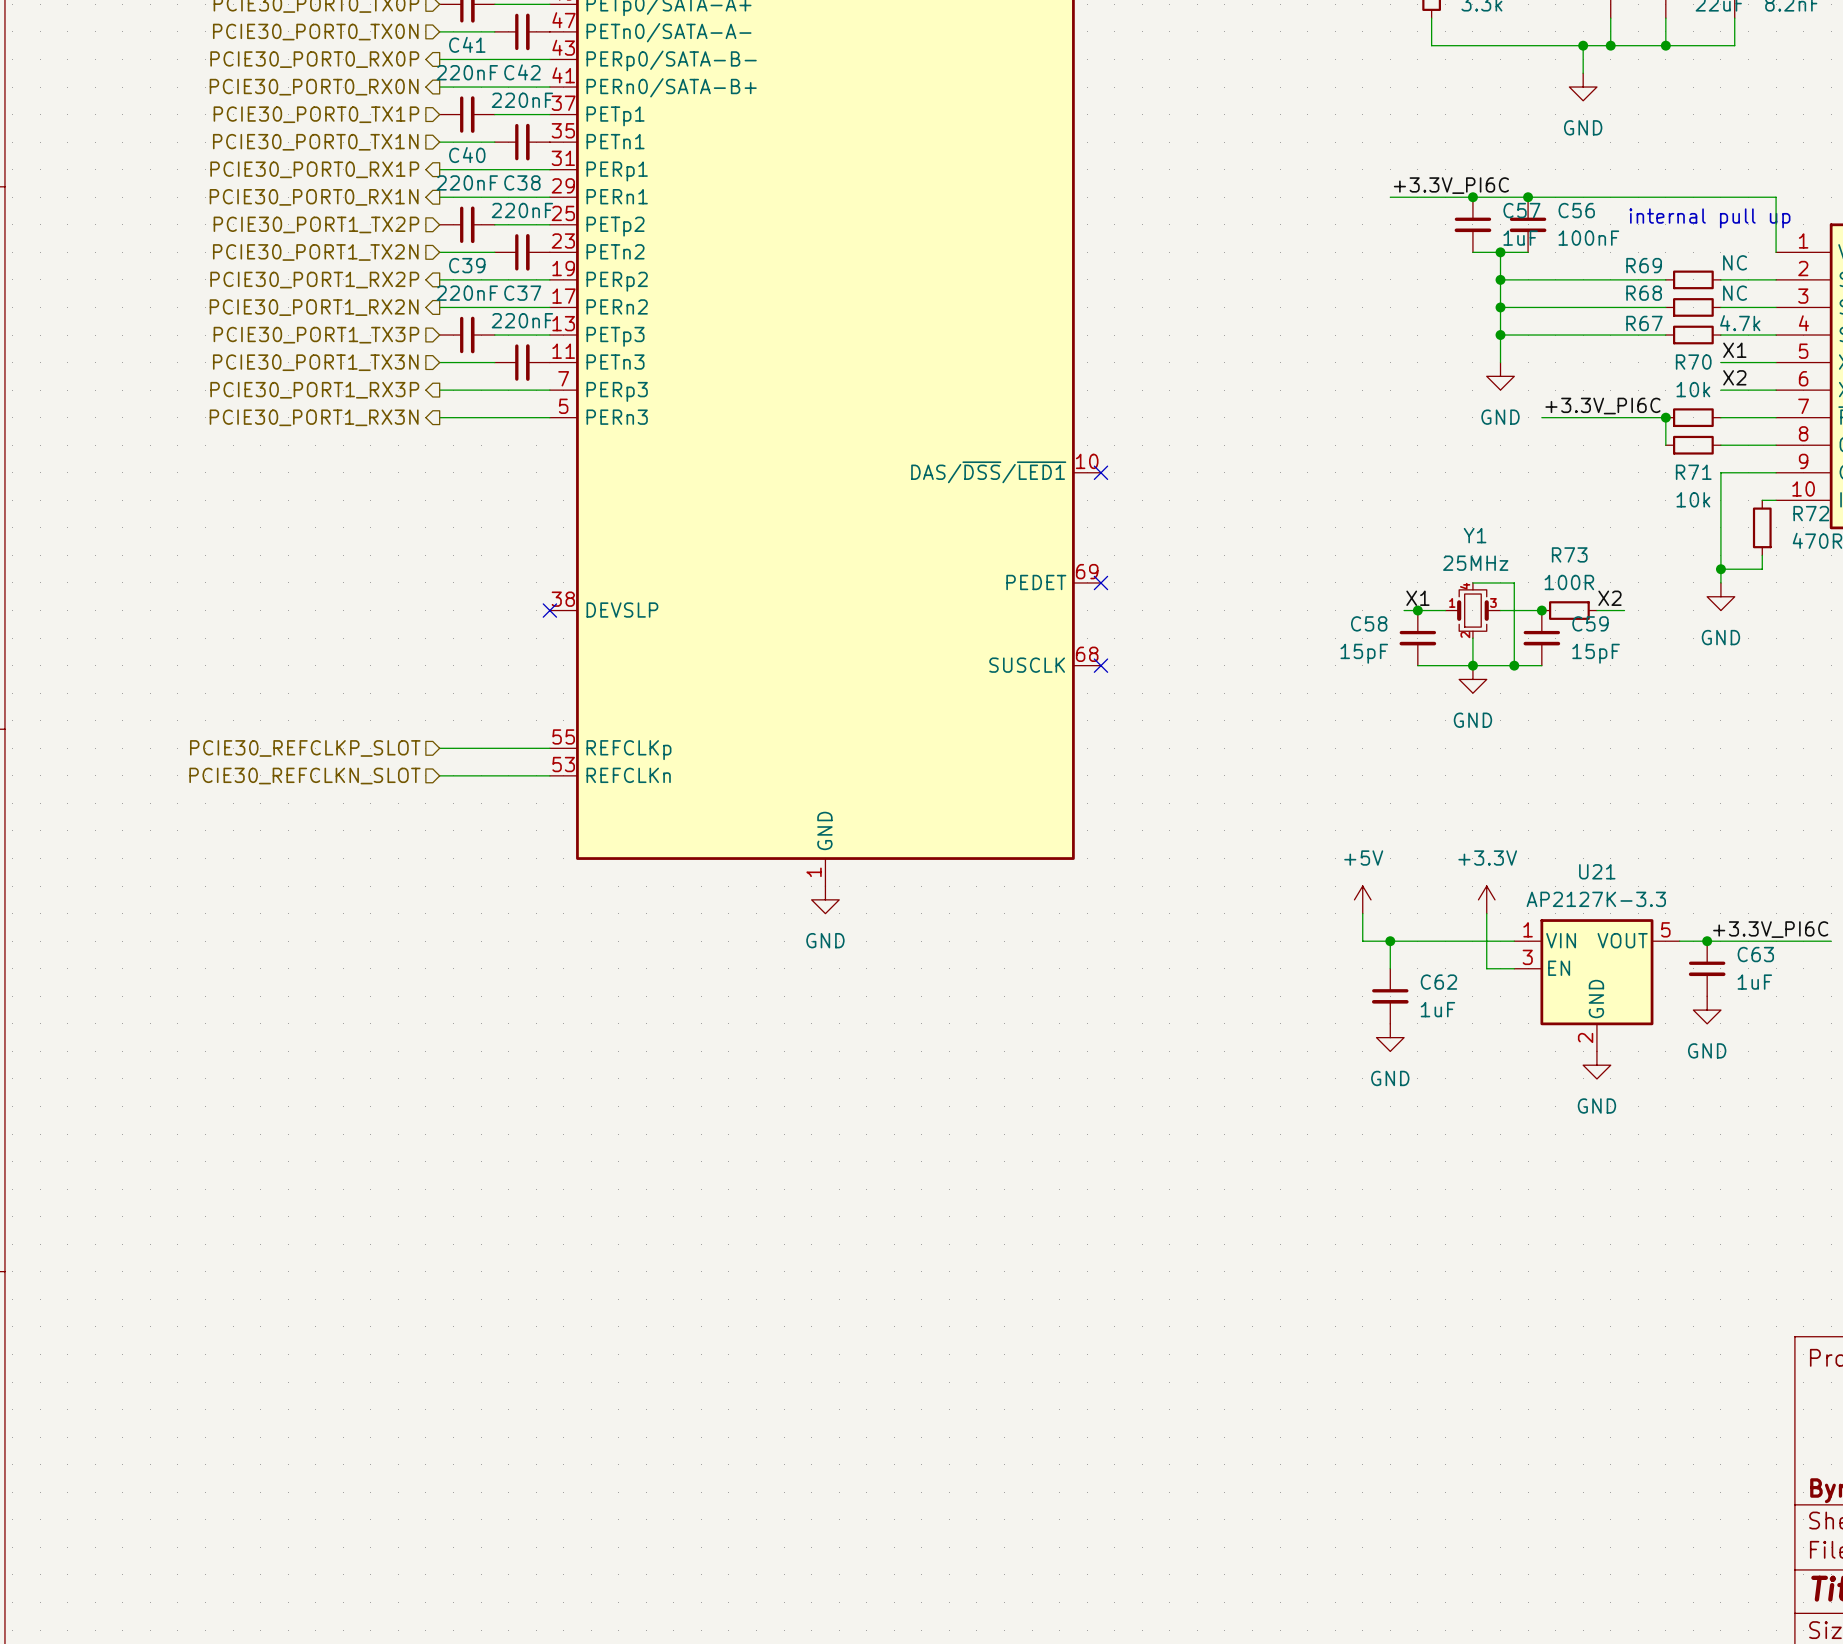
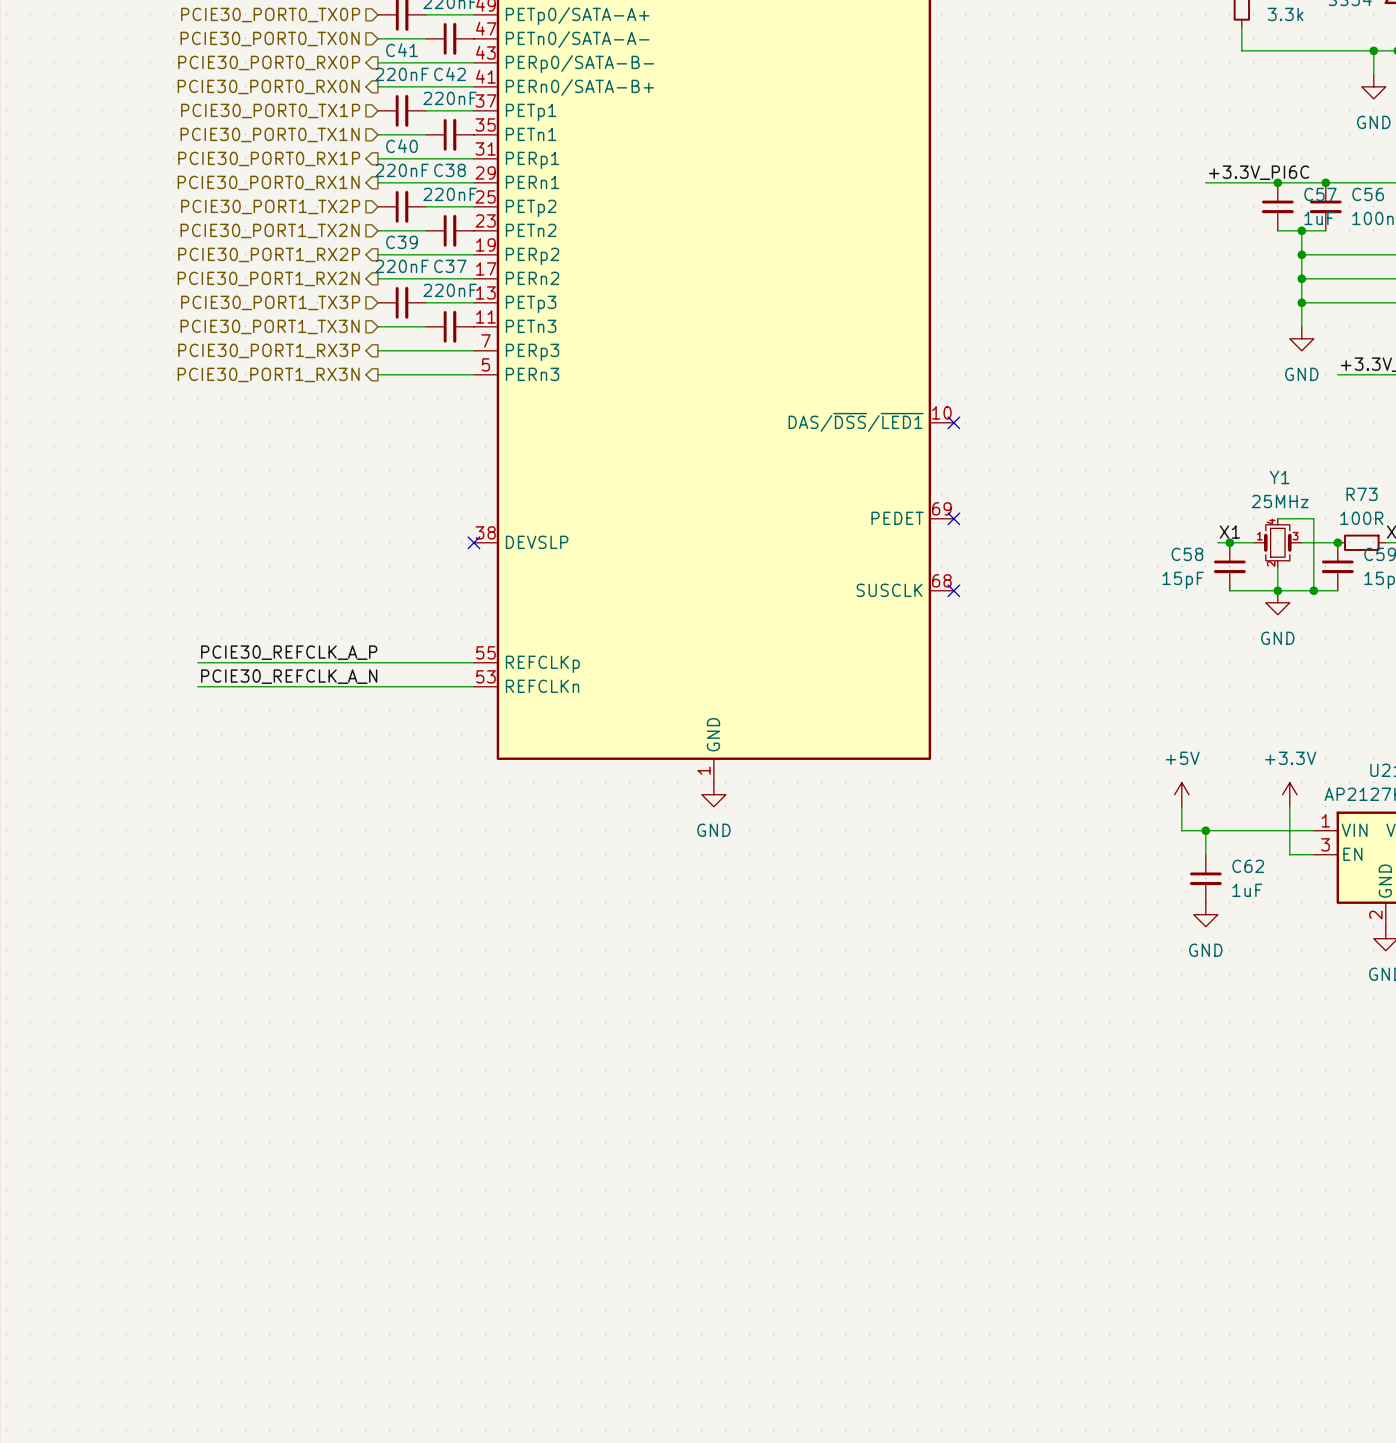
label: none -> PCIE30_REFCLK_A_P (289, 652)
wire: none -> (197, 662) (377, 662)
hierarchical label: PCIE30_REFCLKP_SLOT (305, 748) -> none
label: none -> PCIE30_REFCLK_A_N (289, 676)
wire: none -> (197, 686) (377, 686)
hierarchical label: PCIE30_REFCLKN_SLOT (304, 776) -> none

